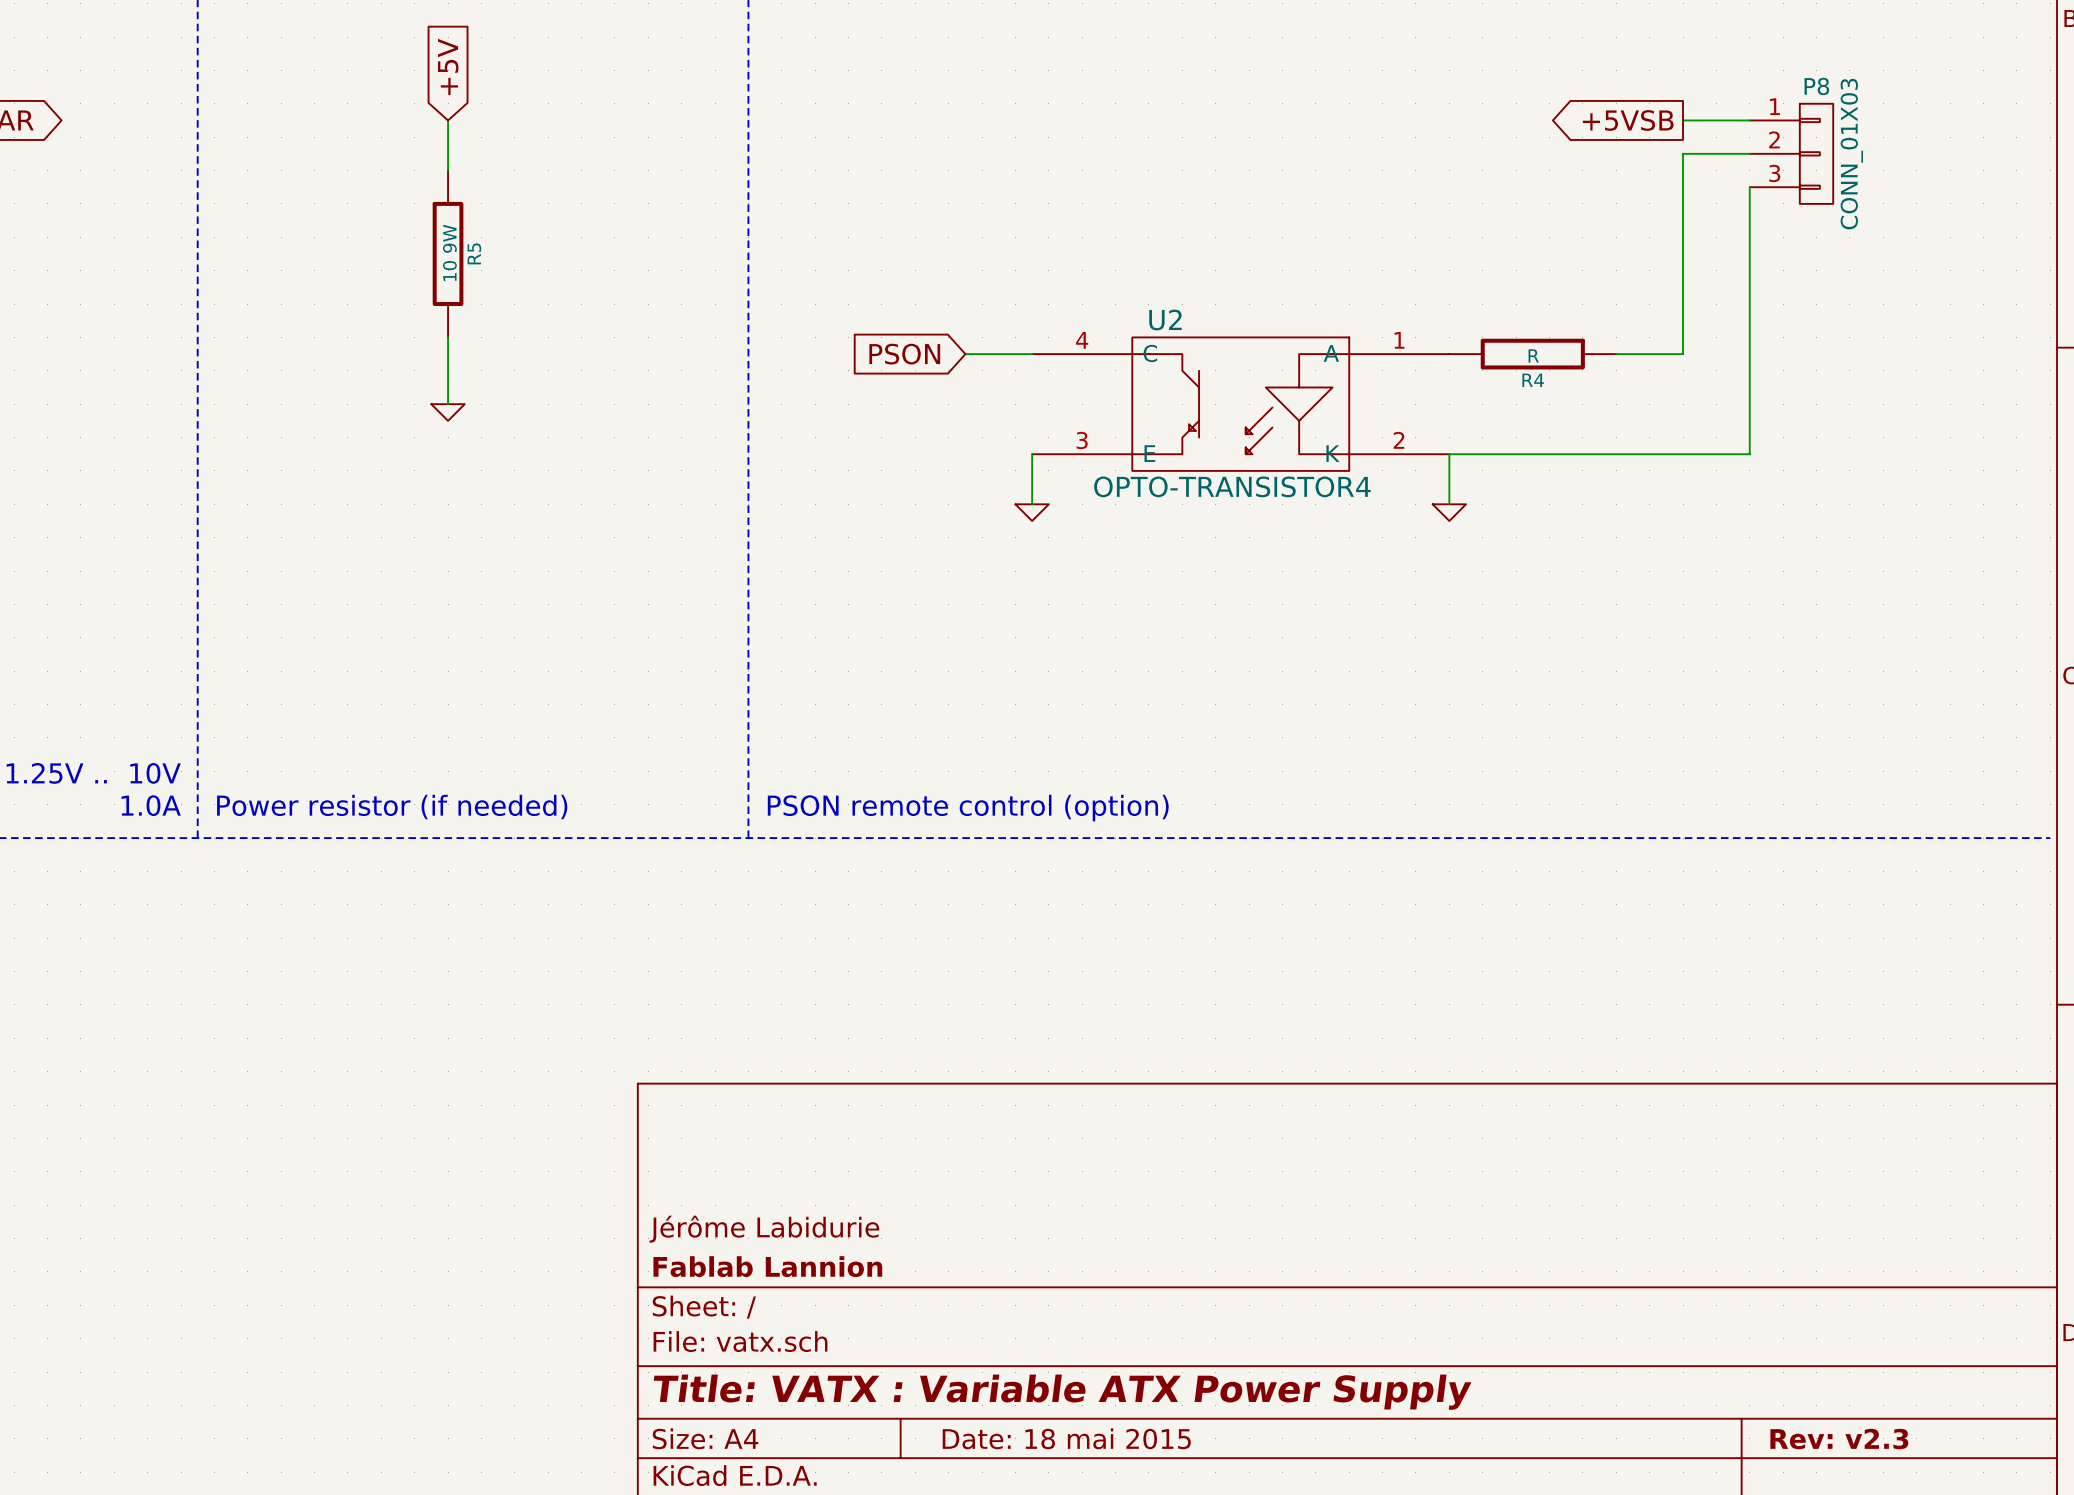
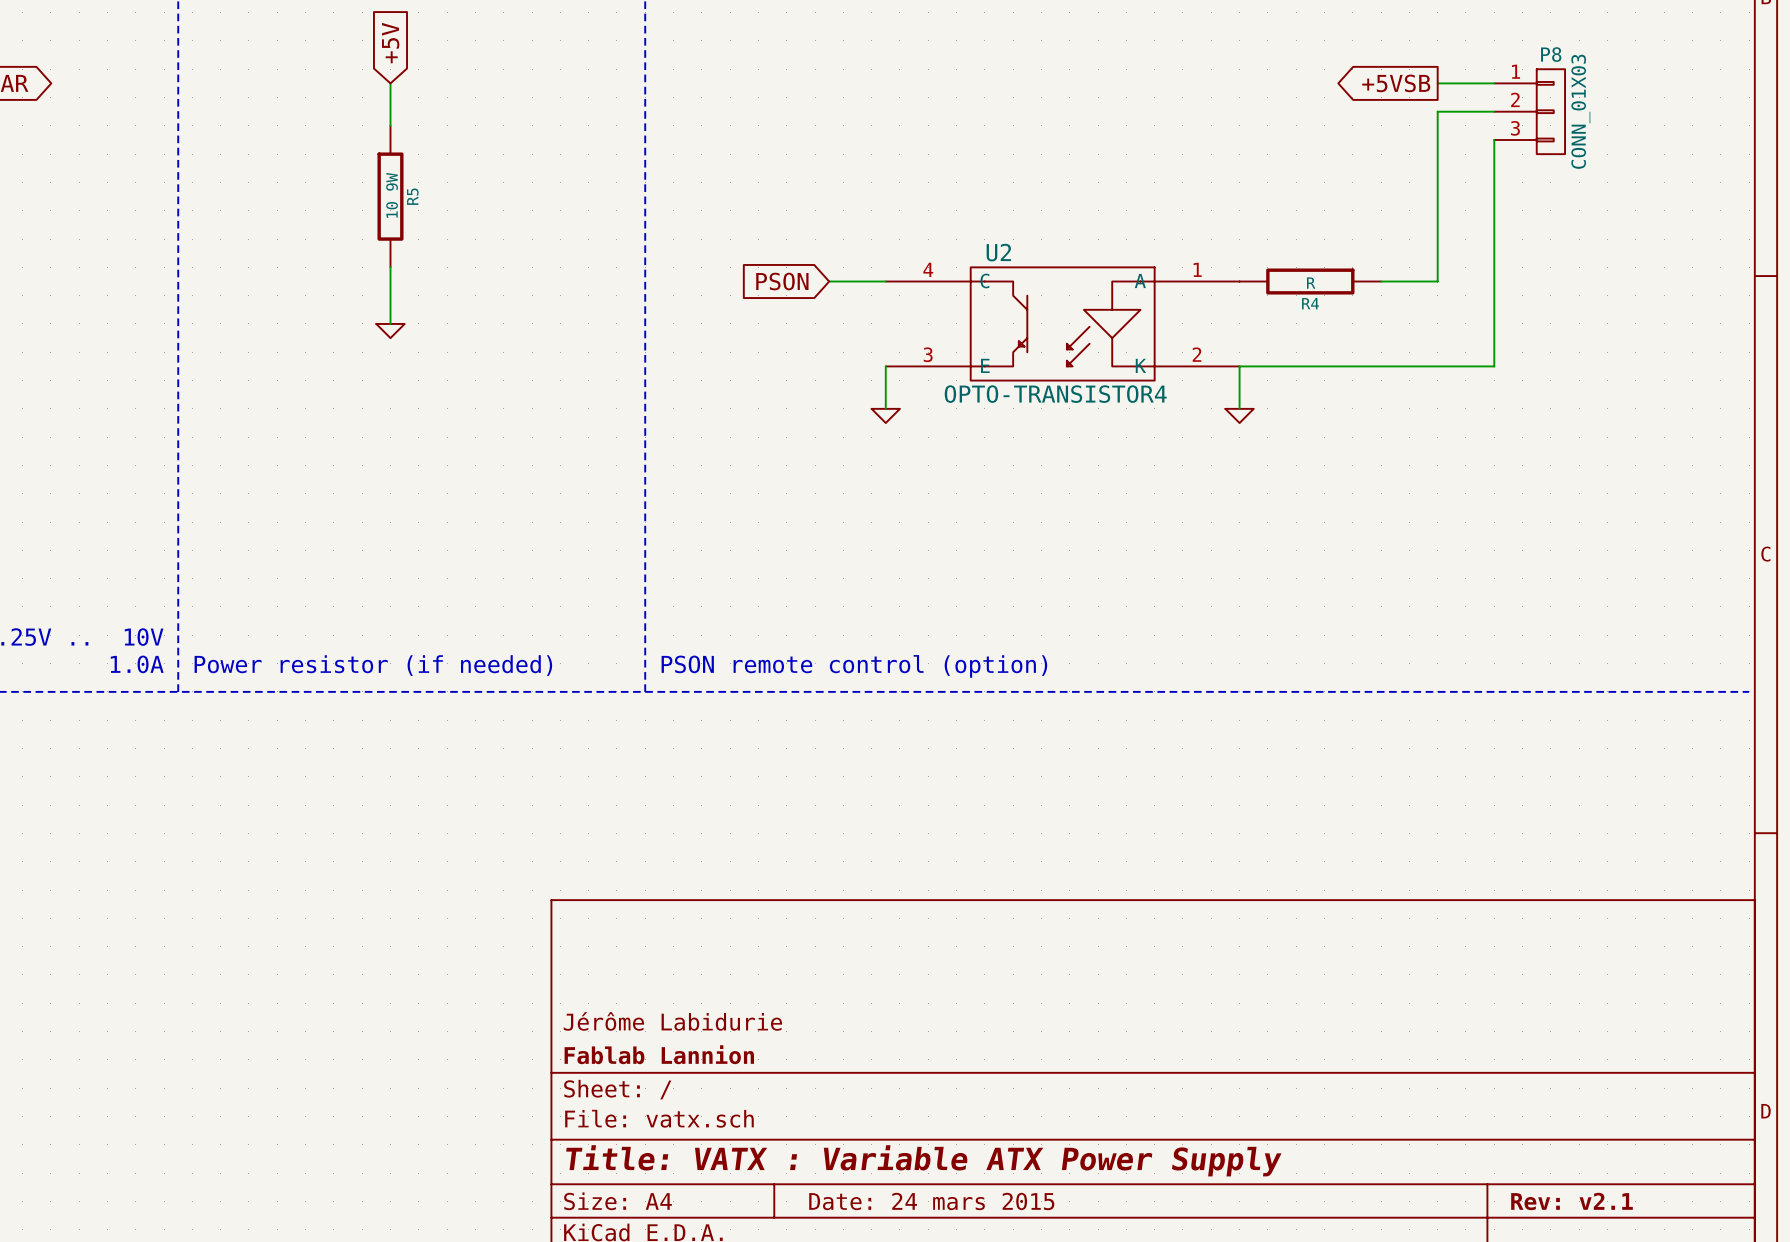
title block: Date: 18 mai 2015 (1066, 1438) -> Date: 24 mars 2015 (931, 1201)
title block: Rev: v2.3 (1839, 1439) -> Rev: v2.1 (1572, 1201)

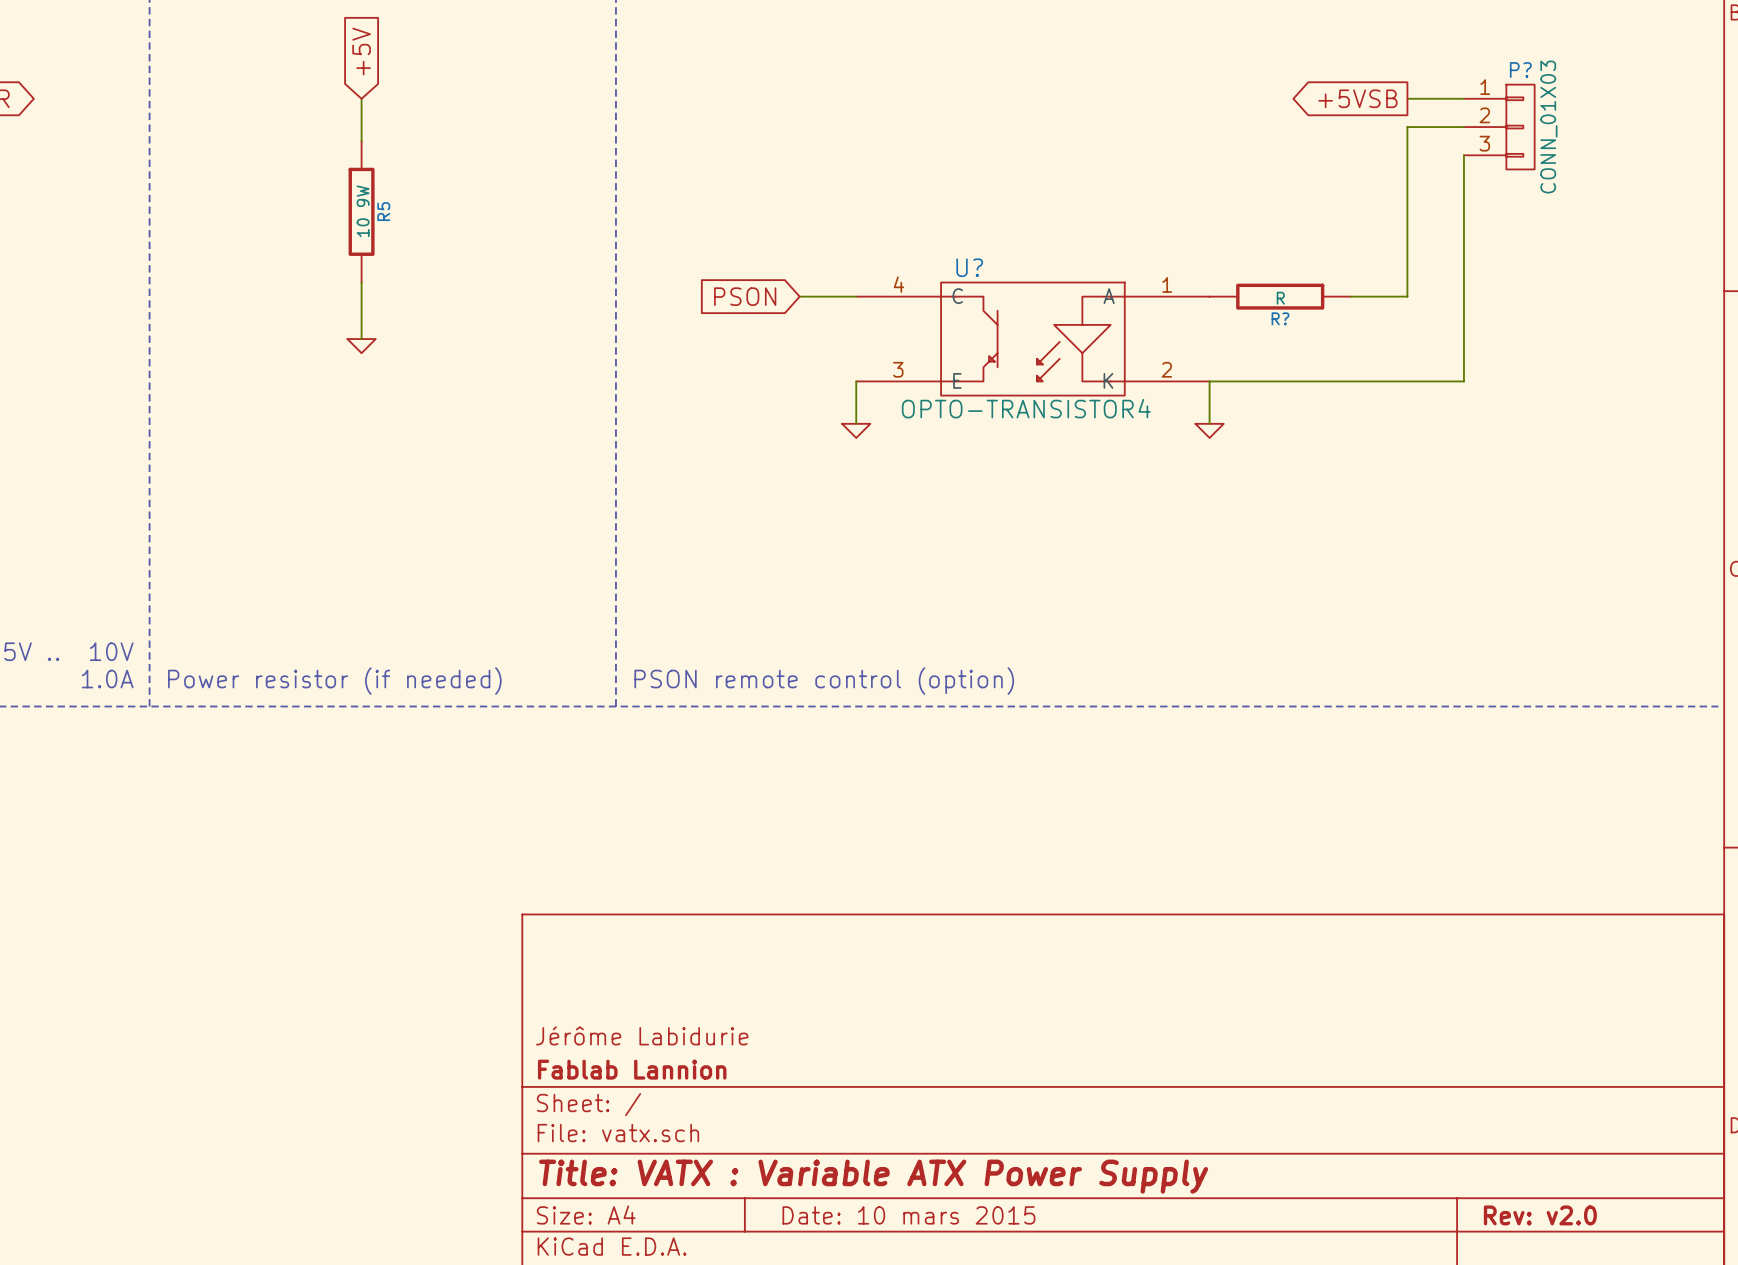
P8 name: P8 (1551, 54) -> P? (1520, 69)
U2 name: U2 (998, 252) -> U? (969, 267)
R4 name: R4 (1310, 303) -> R? (1280, 318)
title block: Date: 24 mars 2015 (931, 1201) -> Date: 10 mars 2015 (908, 1215)
title block: Rev: v2.1 (1572, 1201) -> Rev: v2.0 (1540, 1215)

